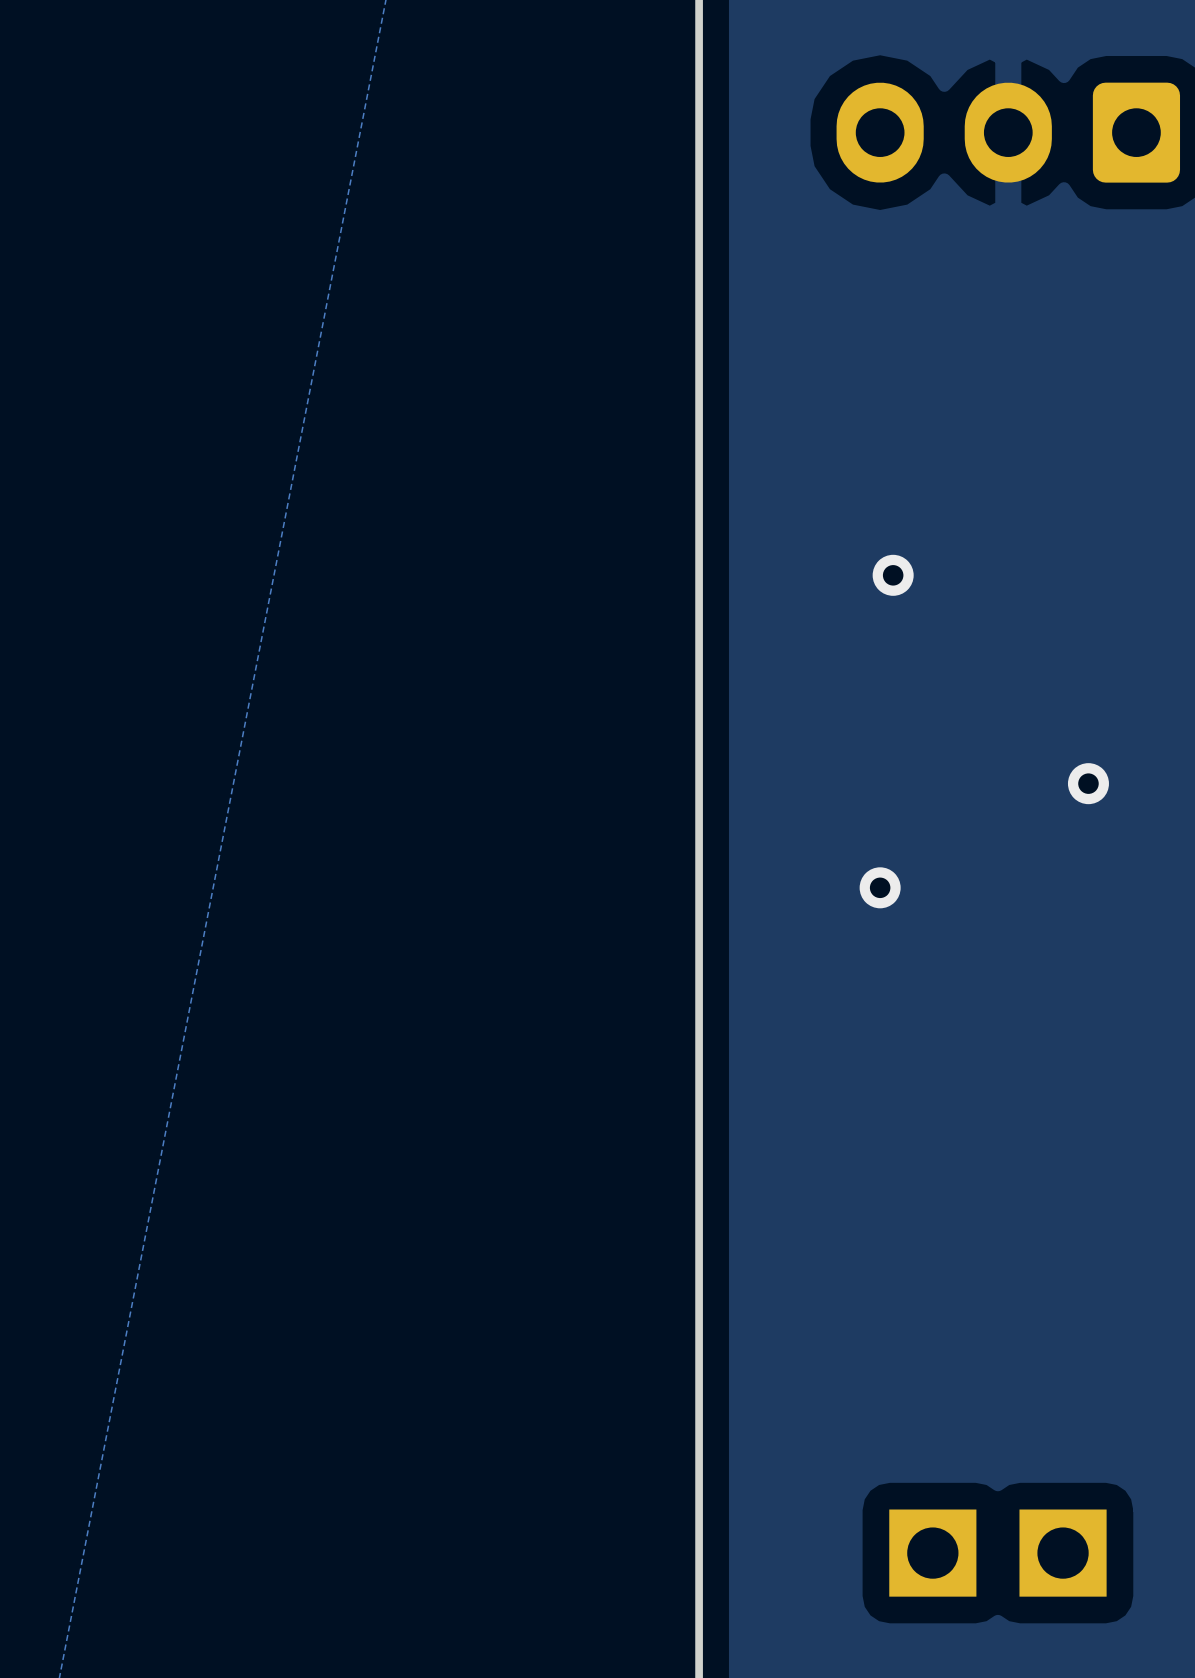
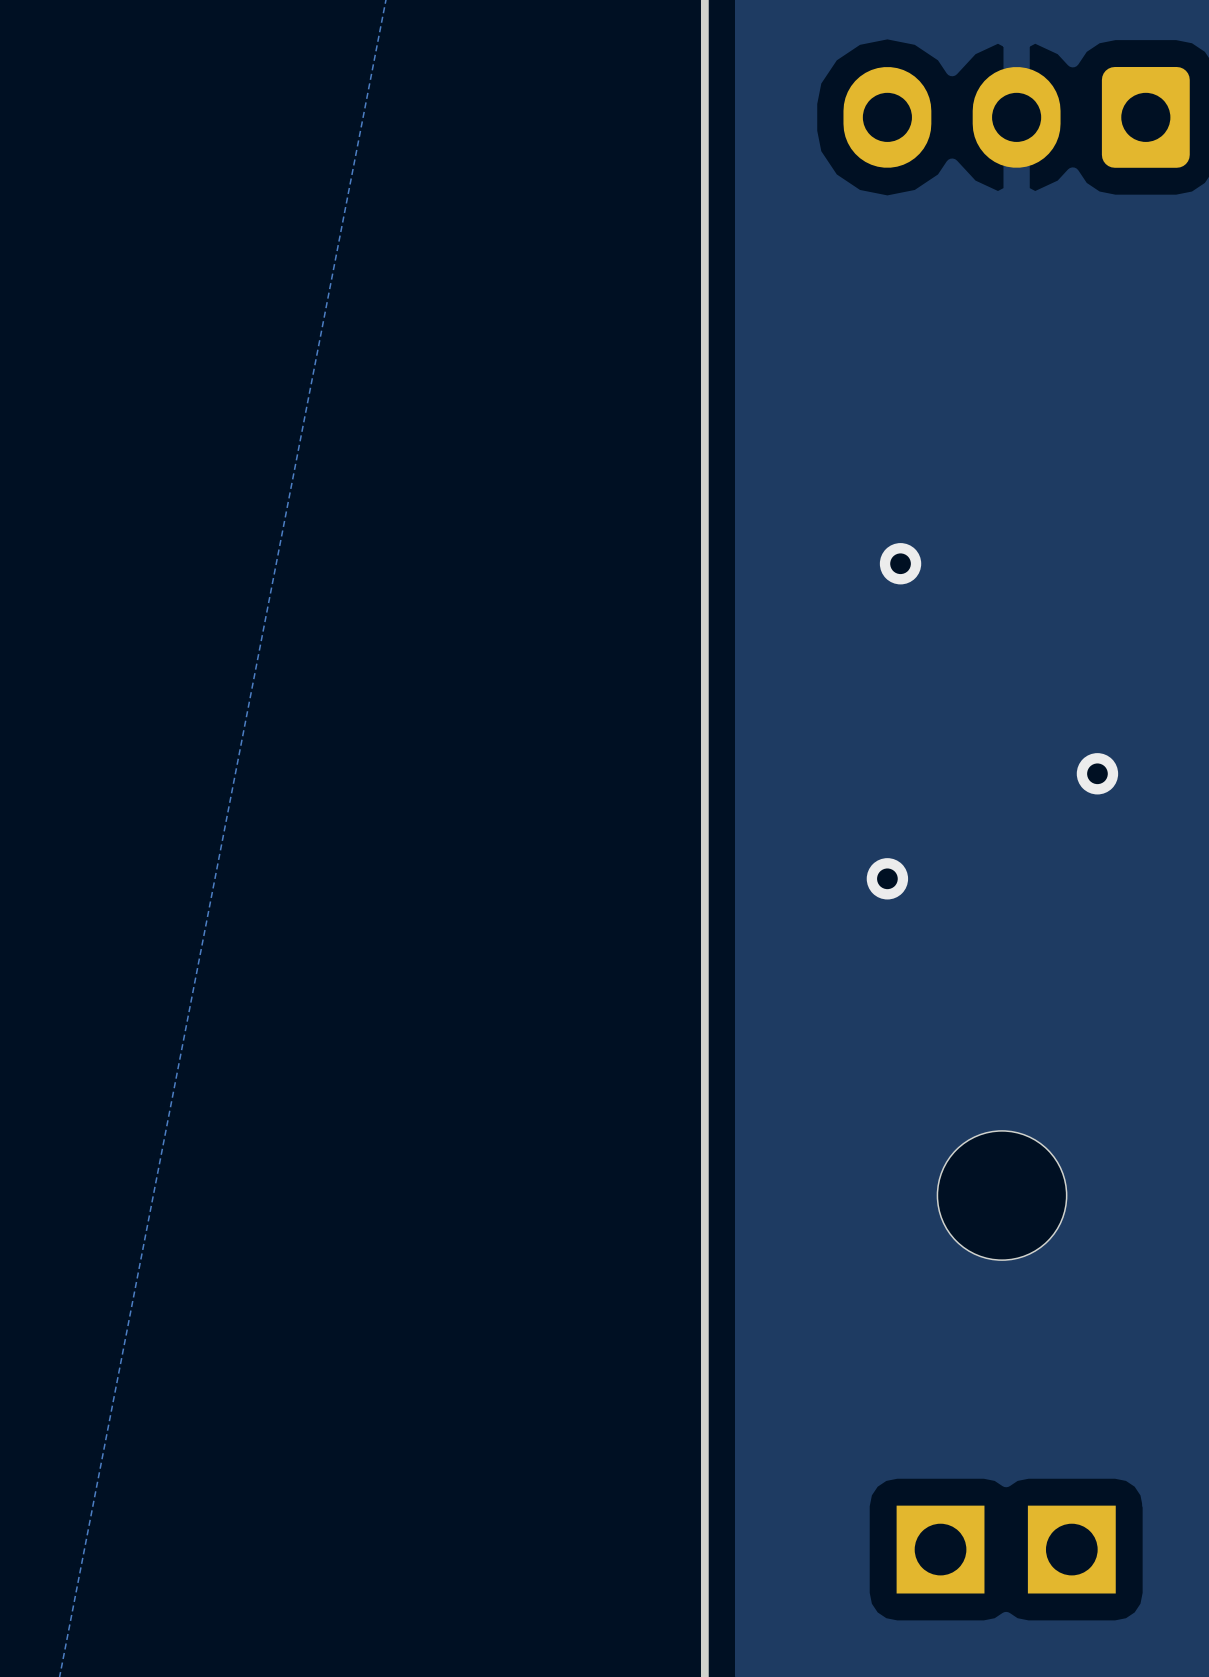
part: none -> (1002, 1195)

